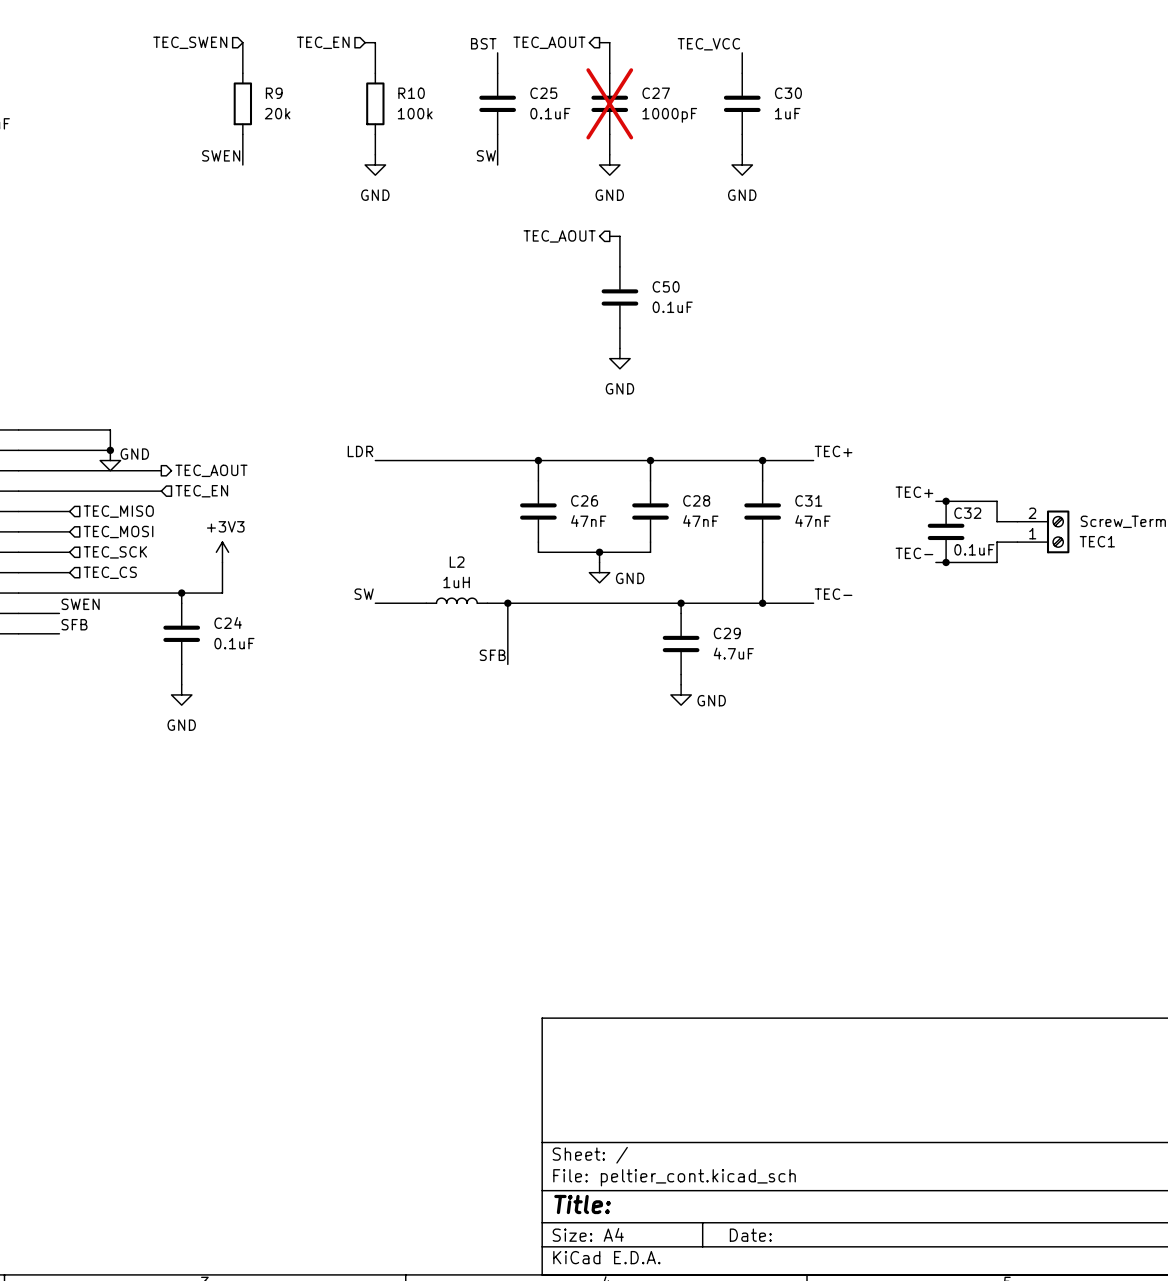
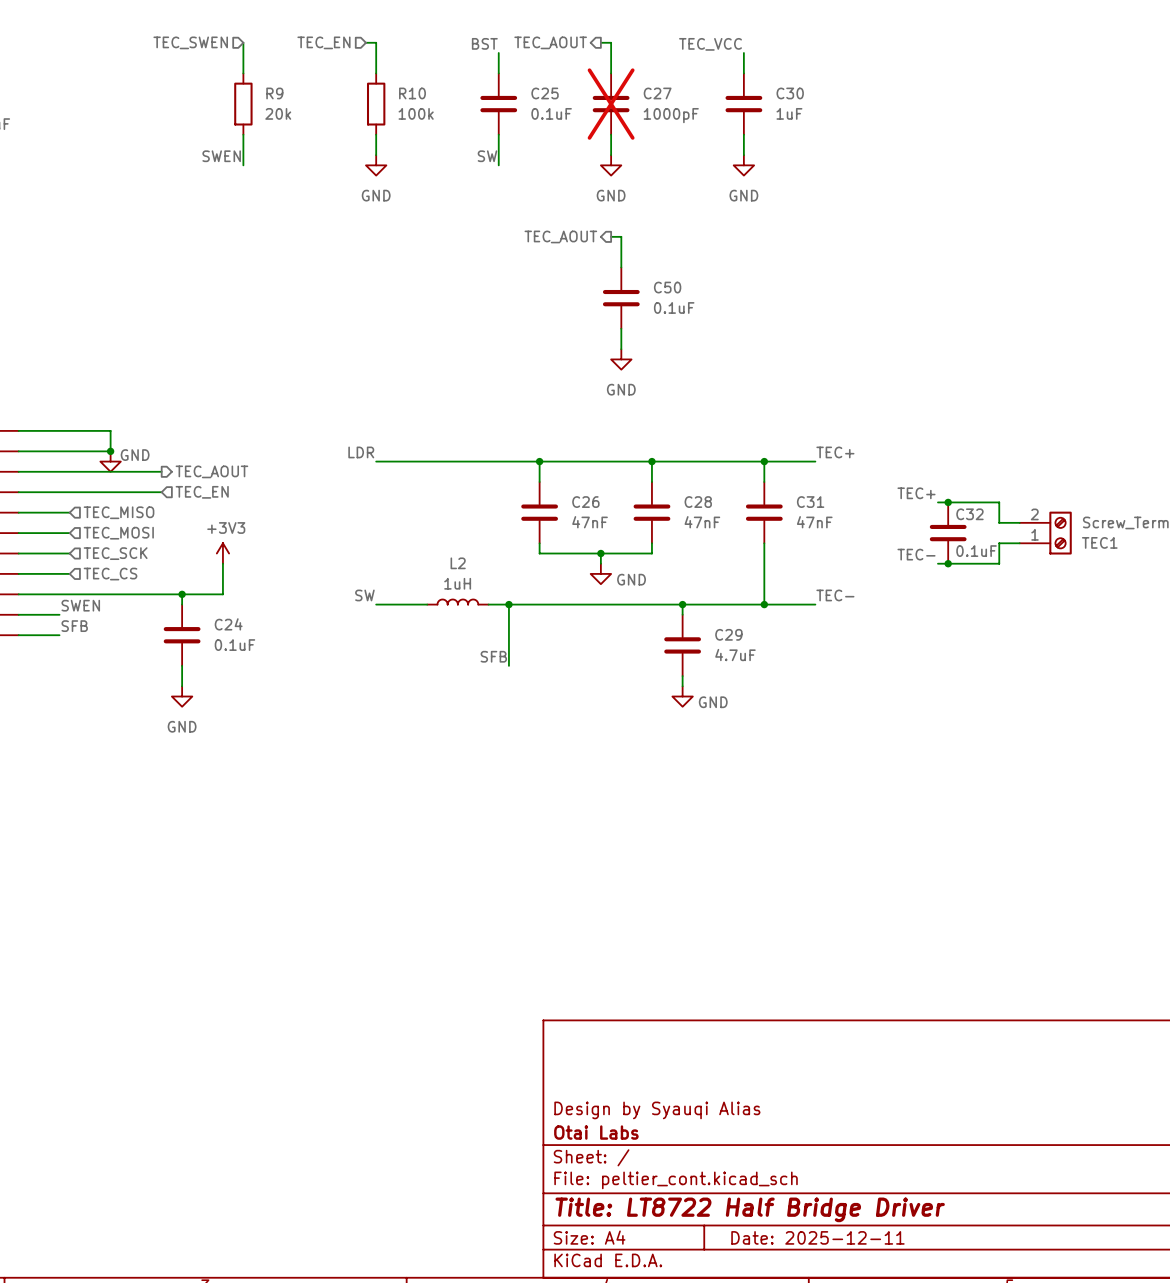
title block: none -> Design by Syauqi Alias (657, 1110)
title block: none -> Otai Labs (596, 1132)
title block: Title: (582, 1204) -> Title: LT8722 Half Bridge Driver (750, 1209)
title block: Date: (750, 1235) -> Date: 2025-12-11 (817, 1237)

